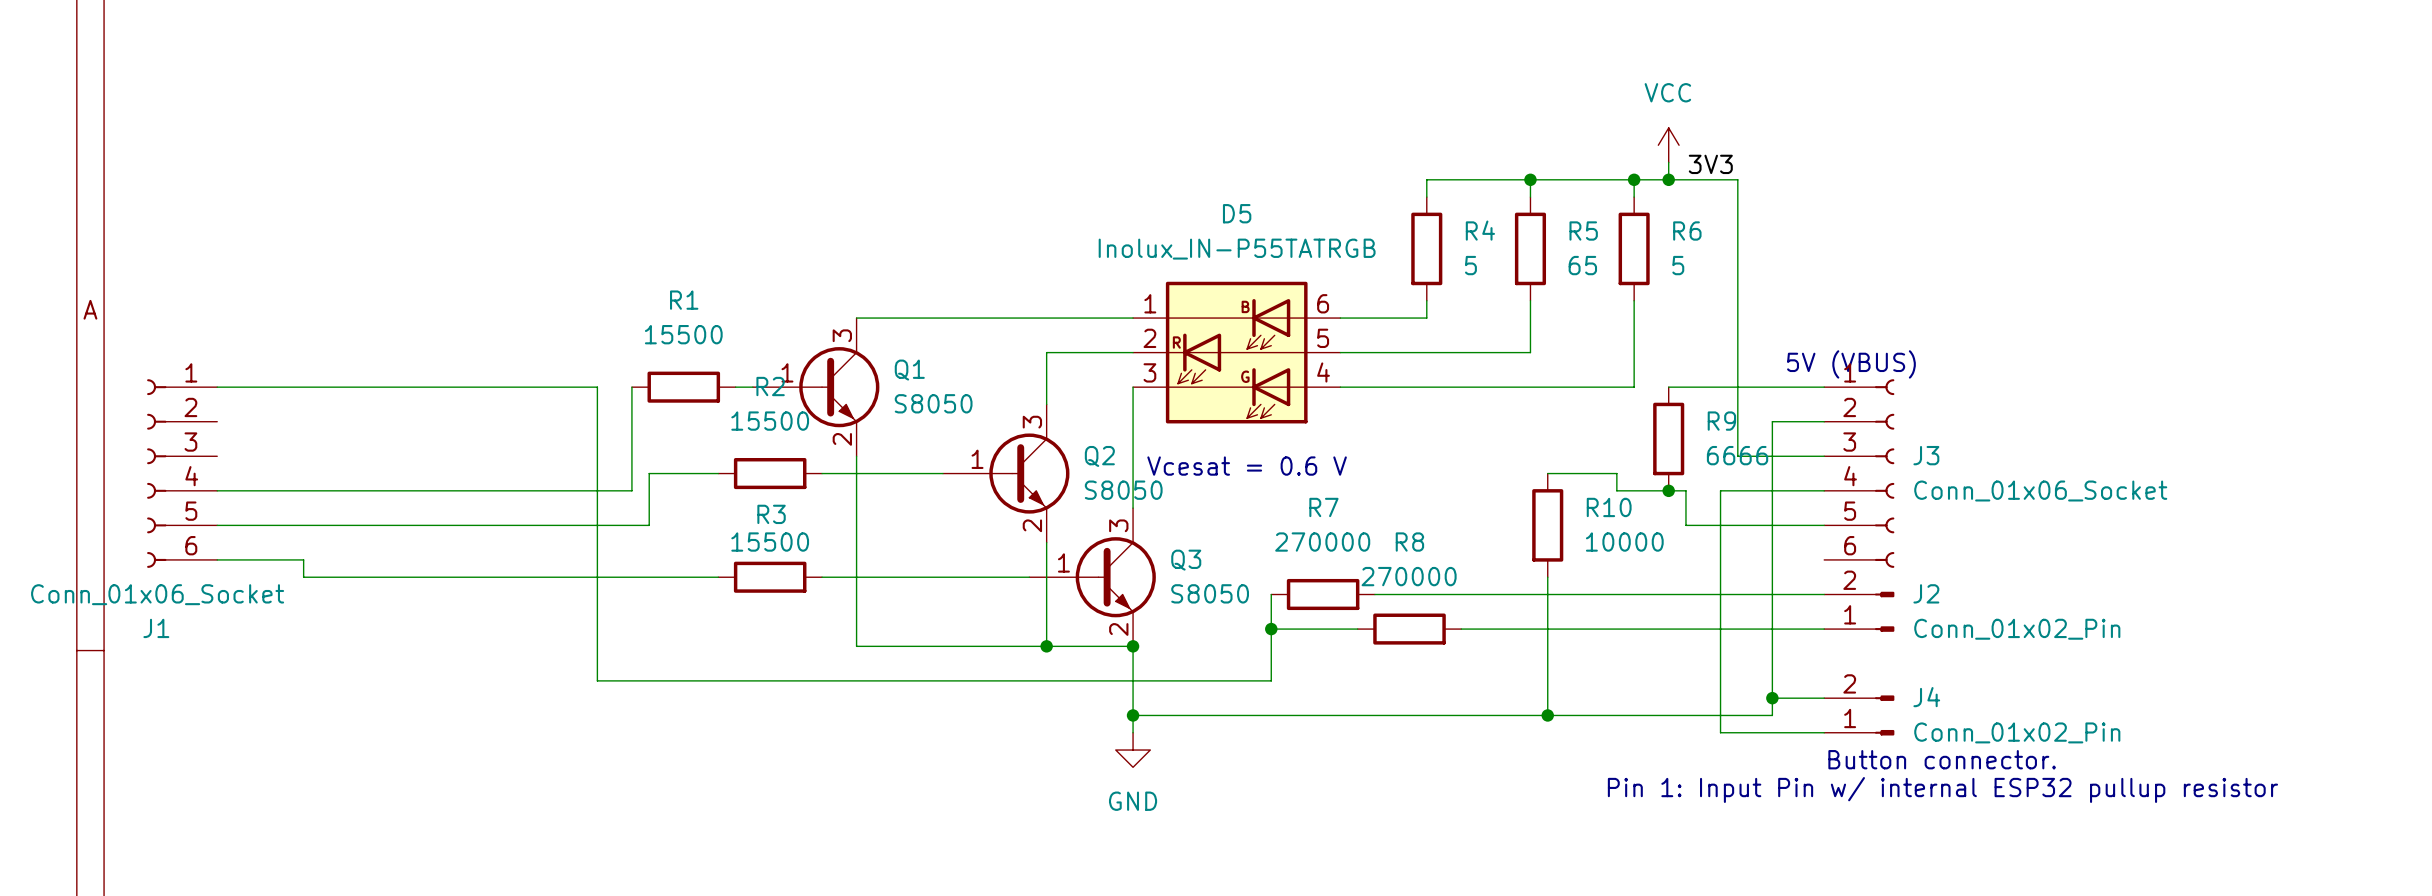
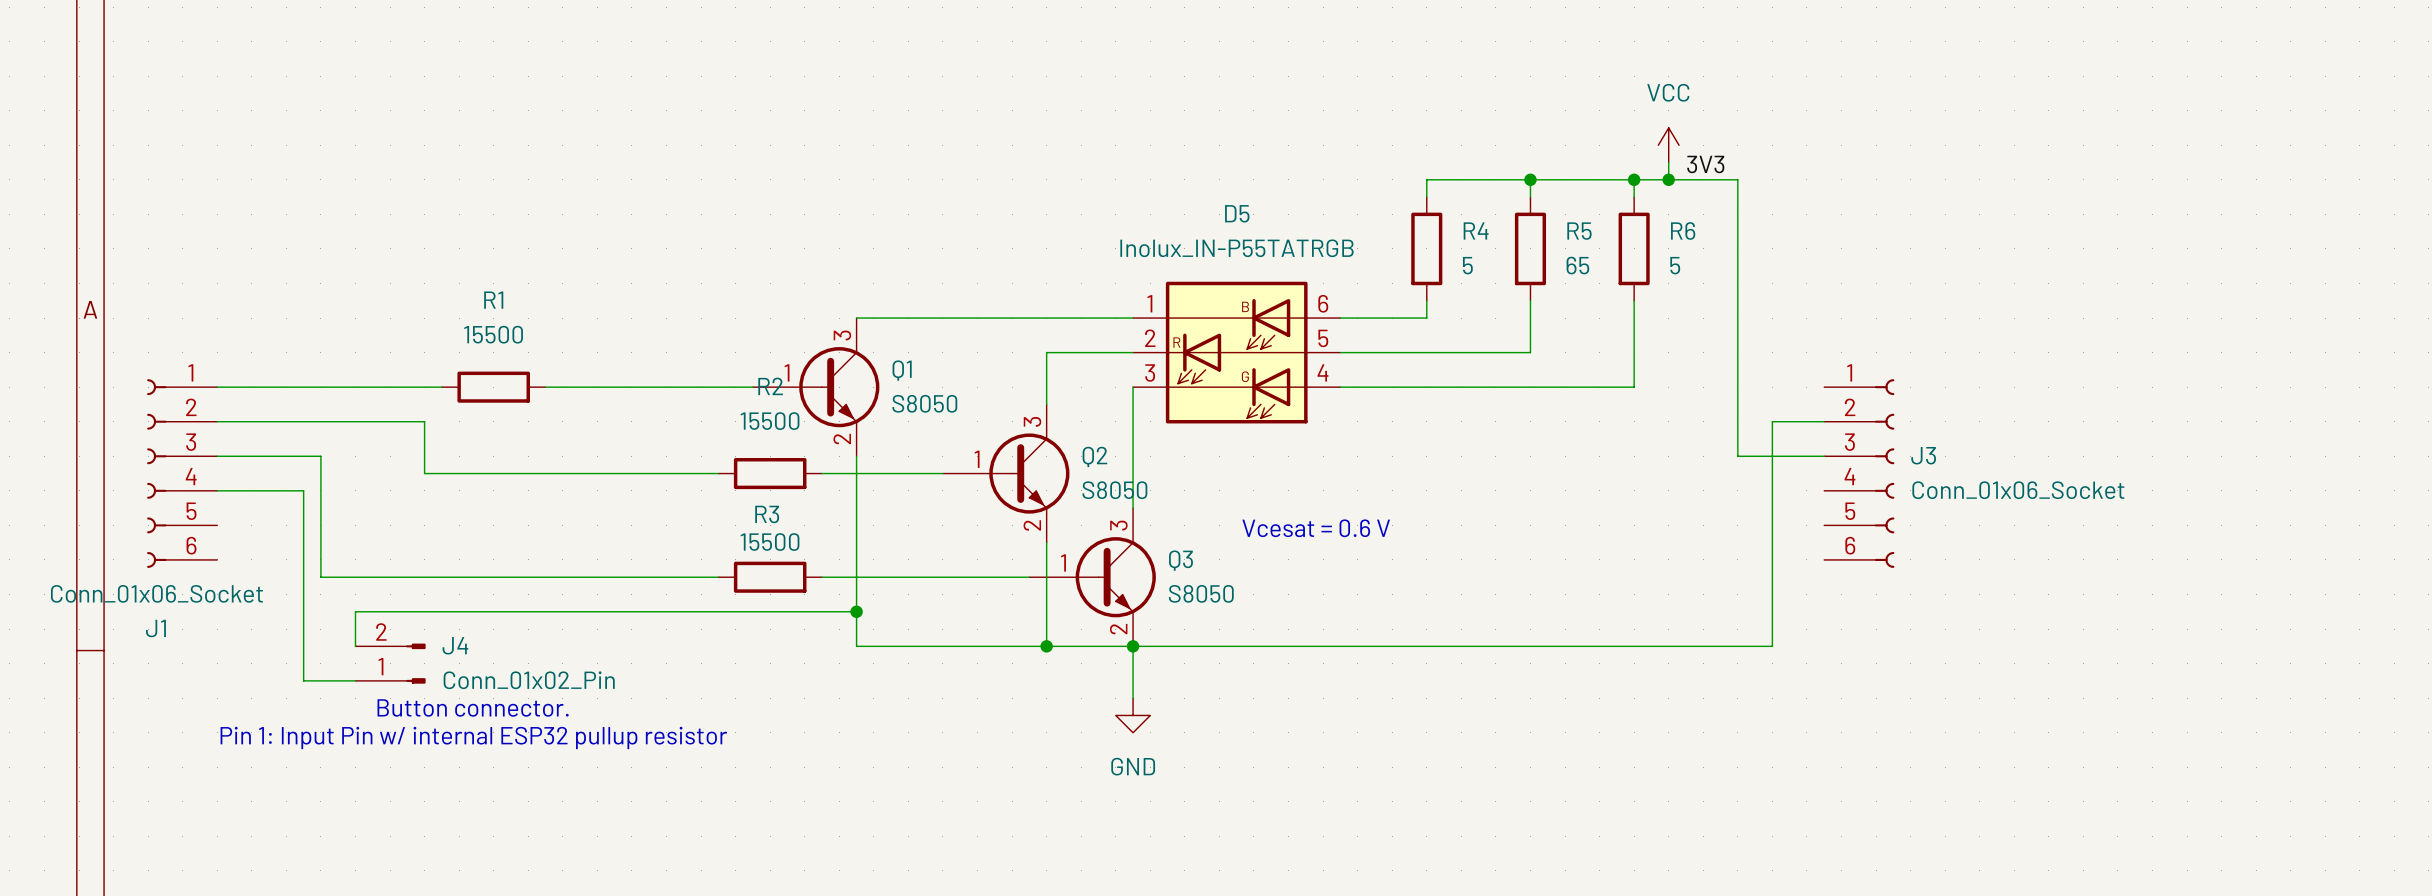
text: 5V (VBUS) (1851, 364) -> none
wire: (441, 387) (545, 387) -> none
wire: (597, 387) (597, 680) (1271, 680) (1271, 594) -> (597, 387) (735, 387)
wire: (631, 387) (631, 490) (303, 490) -> none
R1 position: (683, 387) -> (493, 387)
wire: (1668, 387) (1824, 387) -> none
R9: 6666 (1668, 438) -> none
wire: none -> (217, 456) (320, 456) (320, 577)
text position: Vcesat = 0.6 V (1247, 466) -> Vcesat = 0.6 V (1316, 528)
wire: (649, 473) (649, 525) (217, 525) -> (649, 473) (424, 473) (424, 421) (217, 421)
wire: (1547, 473) (1616, 473) (1616, 490) (1685, 490) (1685, 525) (1824, 525) -> none
junction: (1668, 490) -> none
wire: (1824, 490) (1720, 490) (1720, 732) (1824, 732) -> none
R10: 10000 (1547, 525) -> none
wire: (217, 559) (303, 559) -> (303, 490) (303, 559)
wire: (303, 577) (320, 577) -> (303, 577) (303, 680) (355, 680)
wire: (1547, 577) (1547, 715) -> none
R7: 270000 (1323, 594) -> none
wire: (1374, 594) (1824, 594) -> none
wire: none -> (856, 611) (355, 611) (355, 646)
junction: none -> (856, 611)
J2: Conn_01x02_Pin (1859, 611) -> none
wire: (1271, 629) (1357, 629) -> none
junction: (1271, 629) -> none
R8: 270000 (1409, 629) -> none
wire: (1461, 629) (1824, 629) -> none
wire: (1772, 646) (1772, 715) (1133, 715) -> (1772, 646) (1133, 646)
wire: (1772, 698) (1824, 698) -> none
junction: (1772, 698) -> none
text: none -> Button connector. (473, 707)
junction: (1133, 715) -> none
junction: (1547, 715) -> none
J4 position: (1859, 715) -> (390, 663)
text: none -> Pin 1: Input Pin w/ internal ESP32 pullup resistor (473, 737)
power symbol position: GND (1133, 750) -> GND (1133, 715)
text: Button connector. (1942, 759) -> none
text: Pin 1: Input Pin w/ internal ESP32 pullup resistor (1942, 790) -> none

